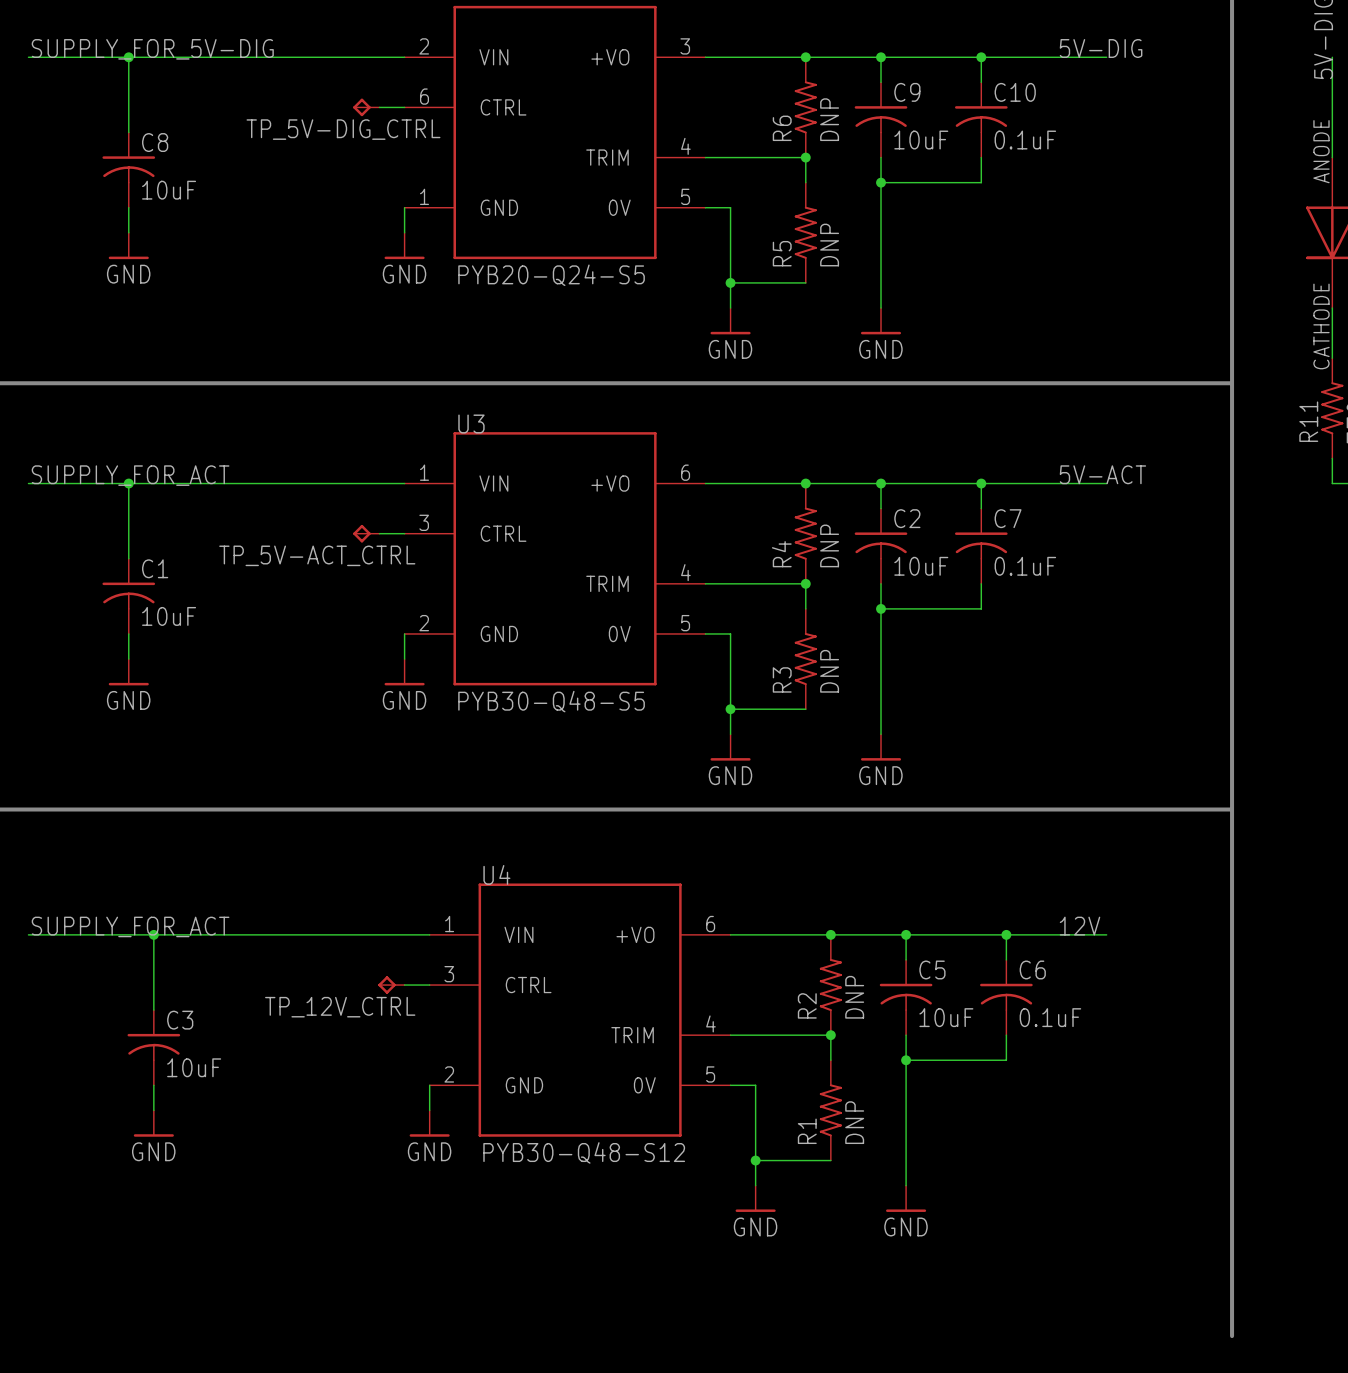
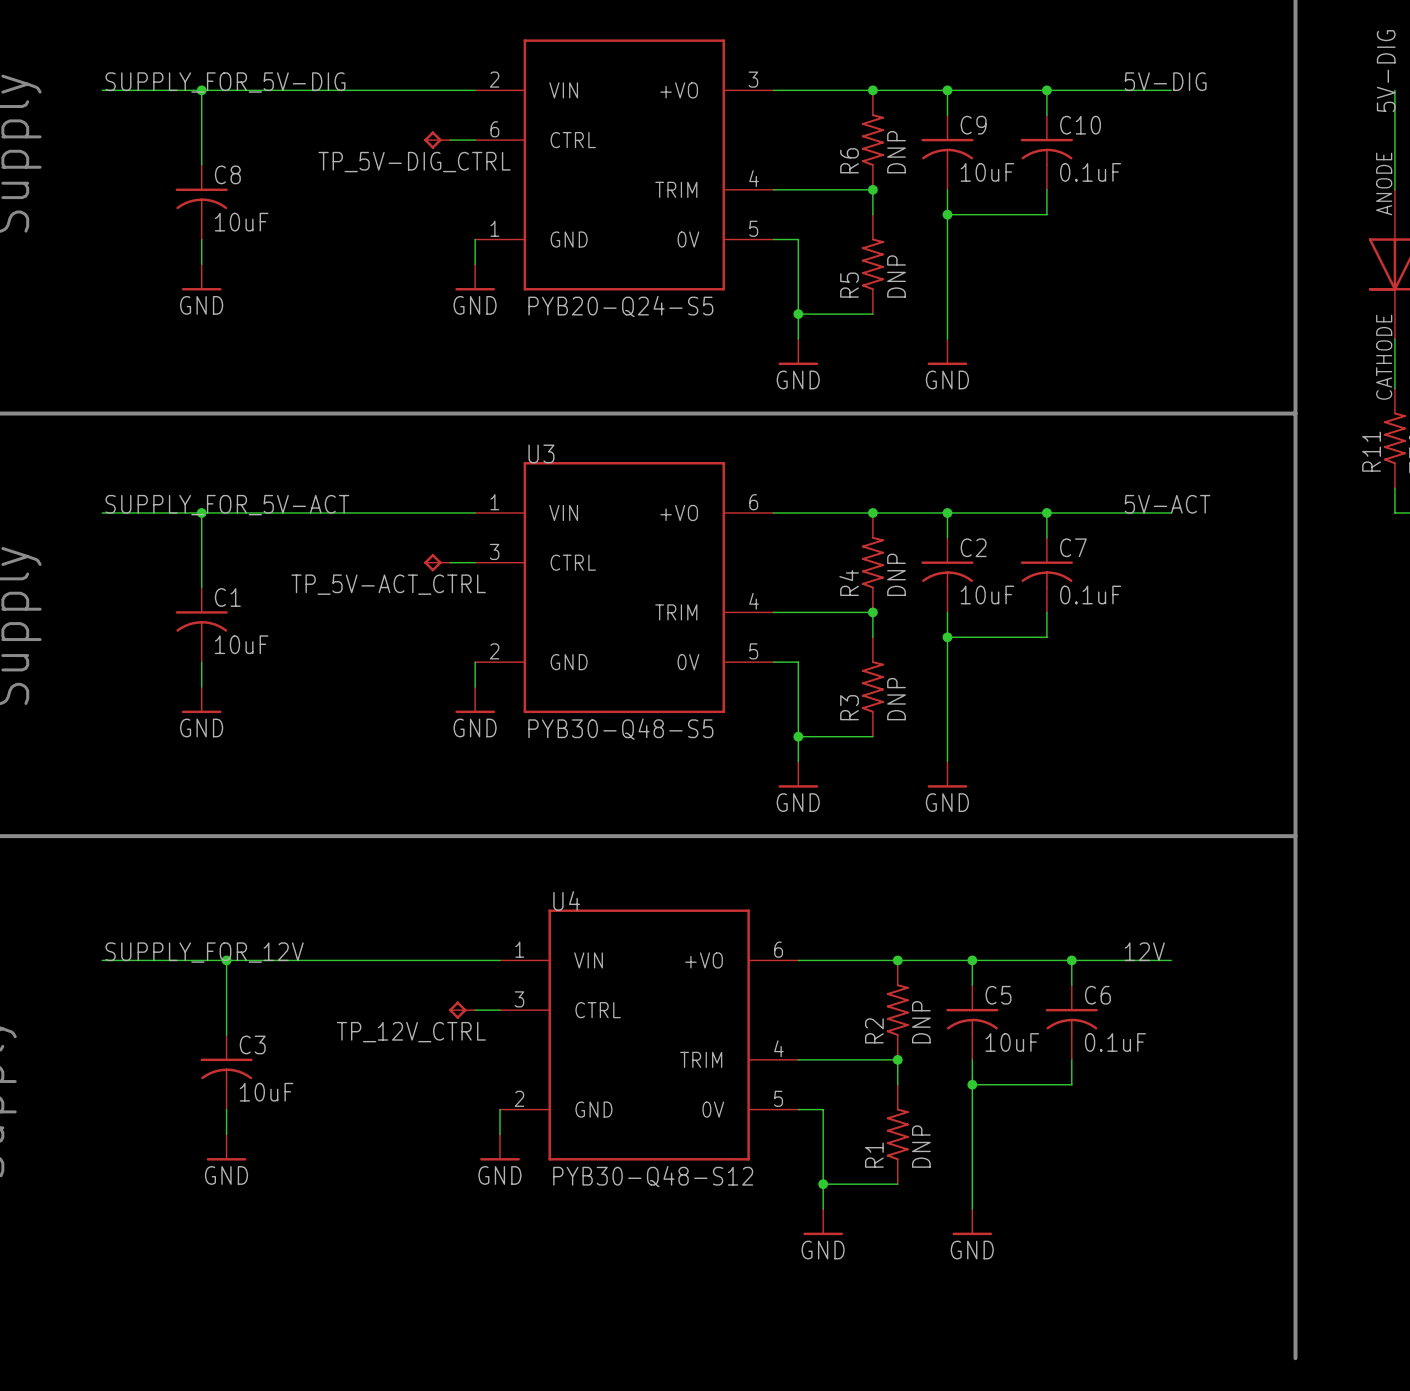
label: SUPPLY_FOR_ACT (130, 475) -> SUPPLY_FOR_5V-ACT (227, 505)
label: SUPPLY_FOR_ACT (130, 926) -> SUPPLY_FOR_12V (204, 952)

